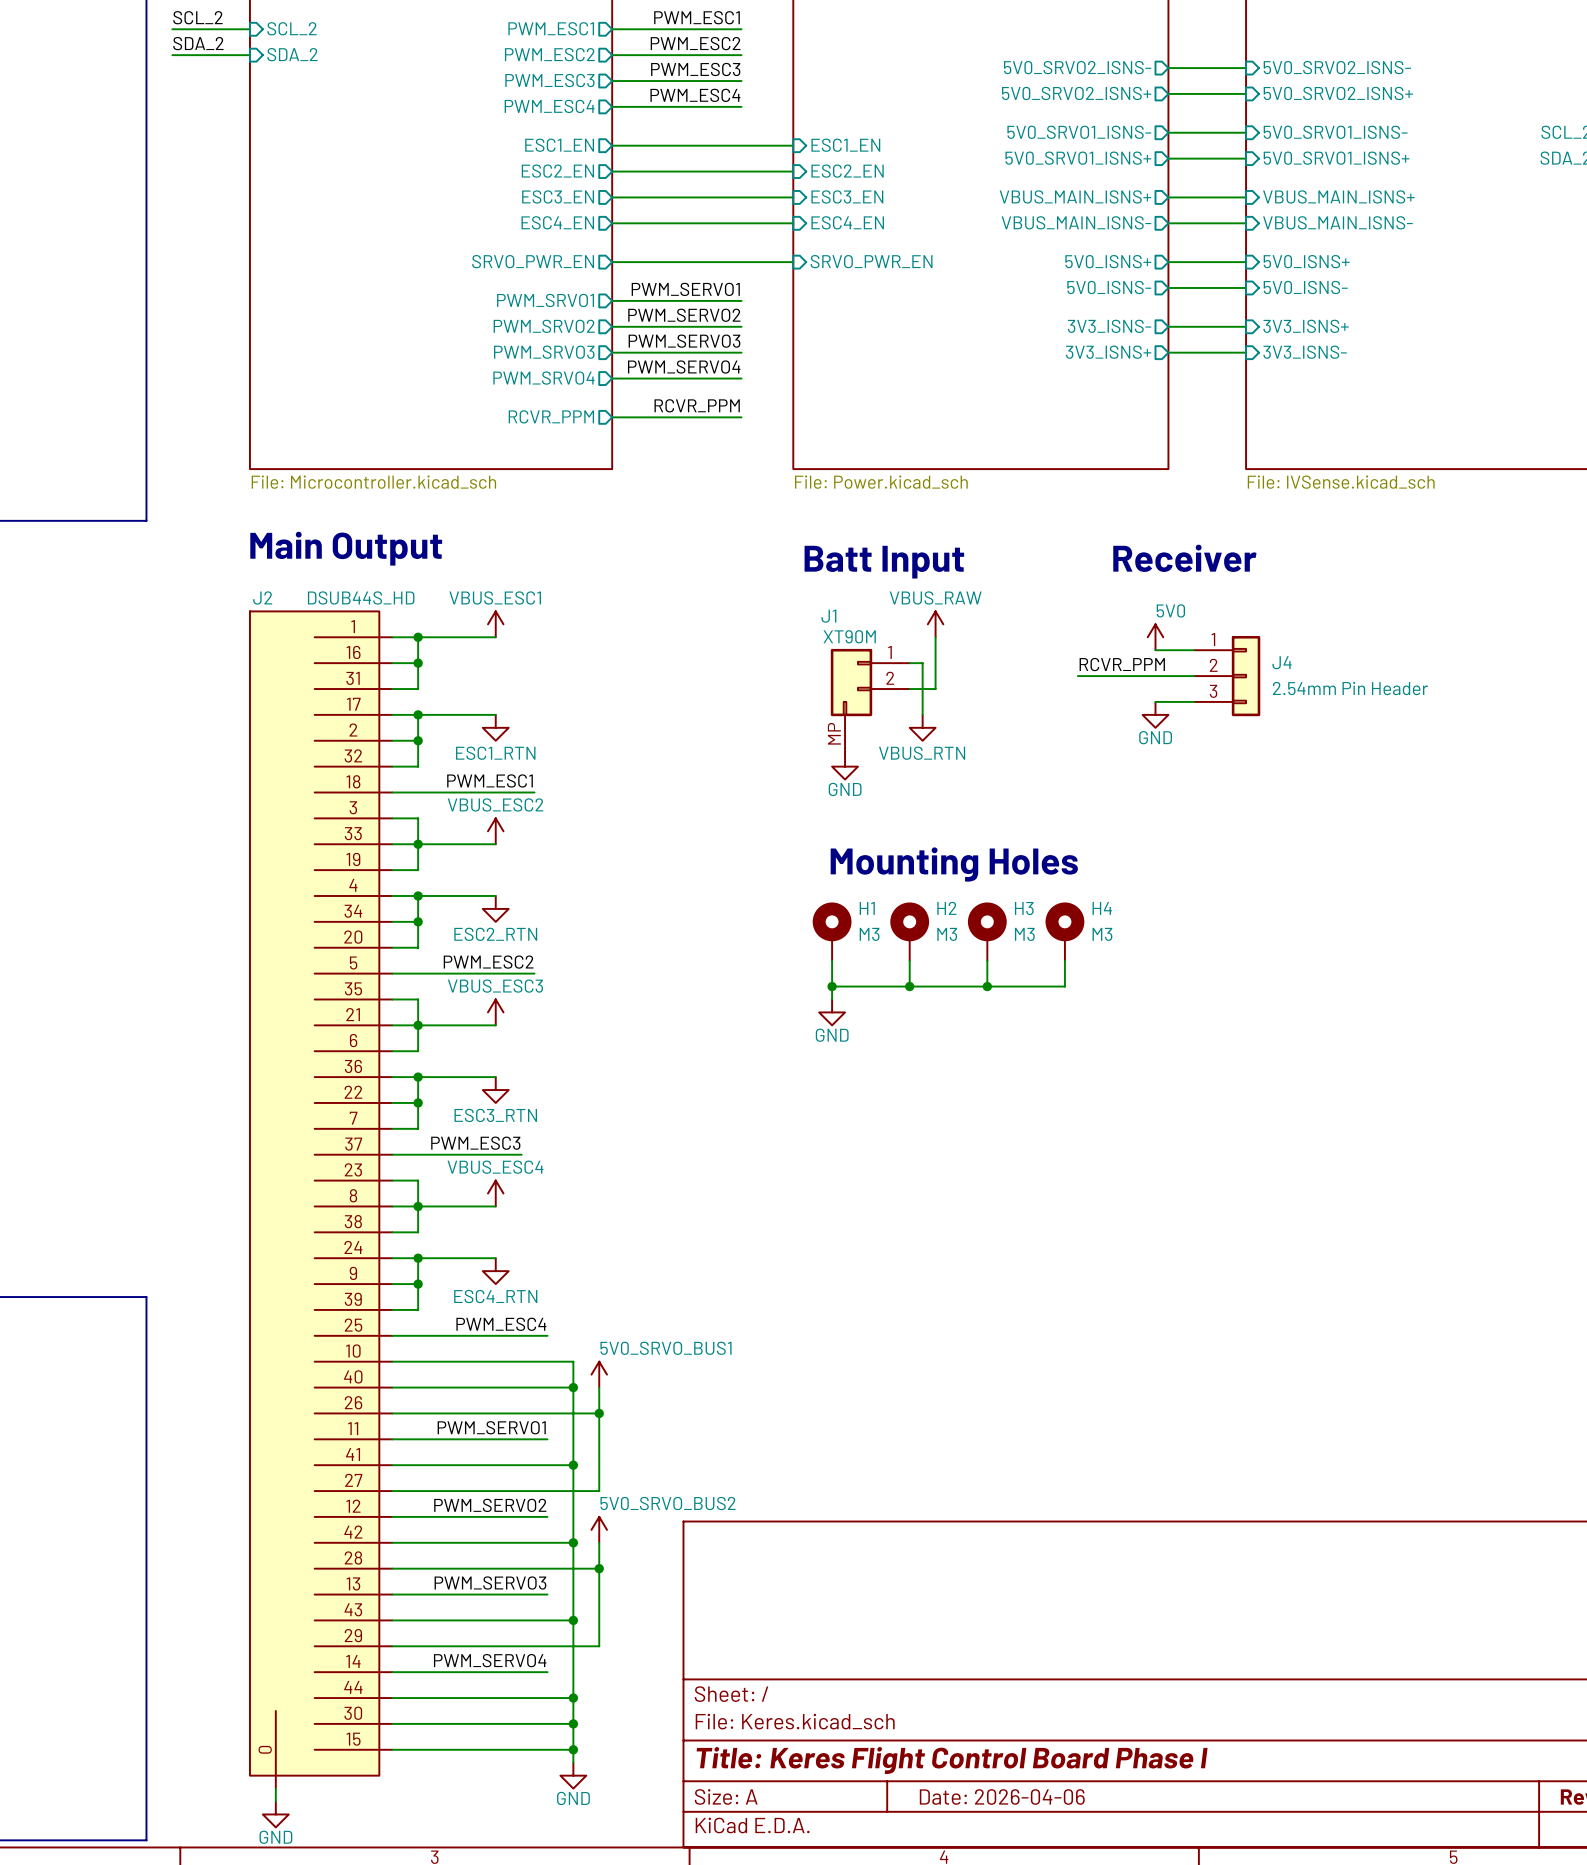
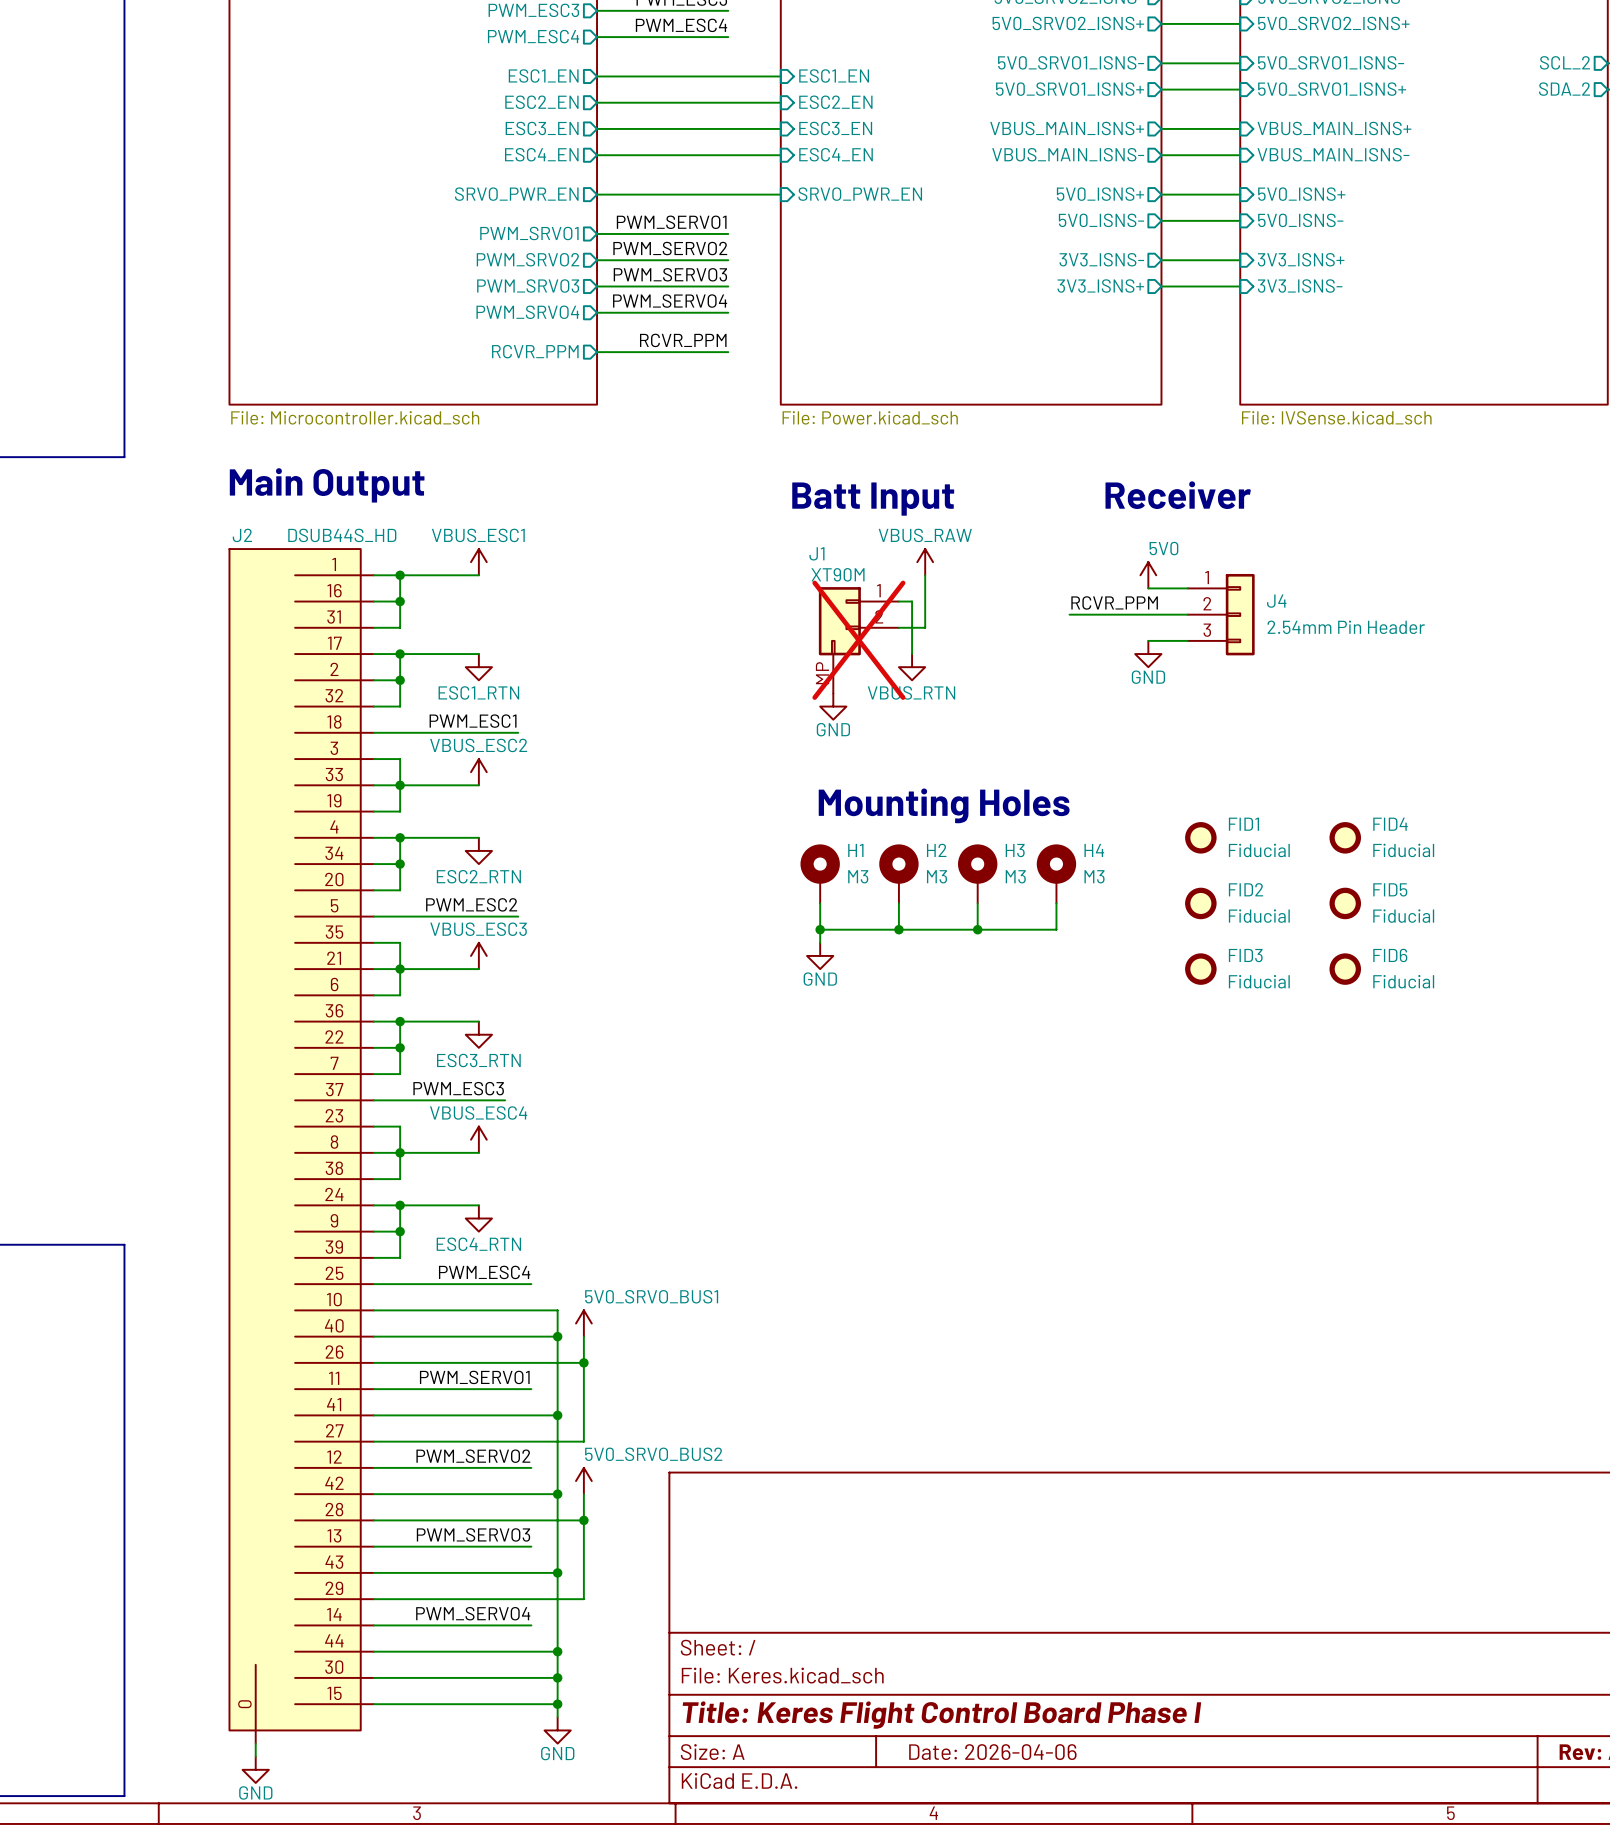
J1 do-not-place cross: none -> (858, 640)
FID1: none -> Fiducial (1200, 837)
FID4: none -> Fiducial (1345, 837)
FID2: none -> Fiducial (1200, 903)
FID5: none -> Fiducial (1345, 903)
FID3: none -> Fiducial (1200, 969)
FID6: none -> Fiducial (1345, 969)

